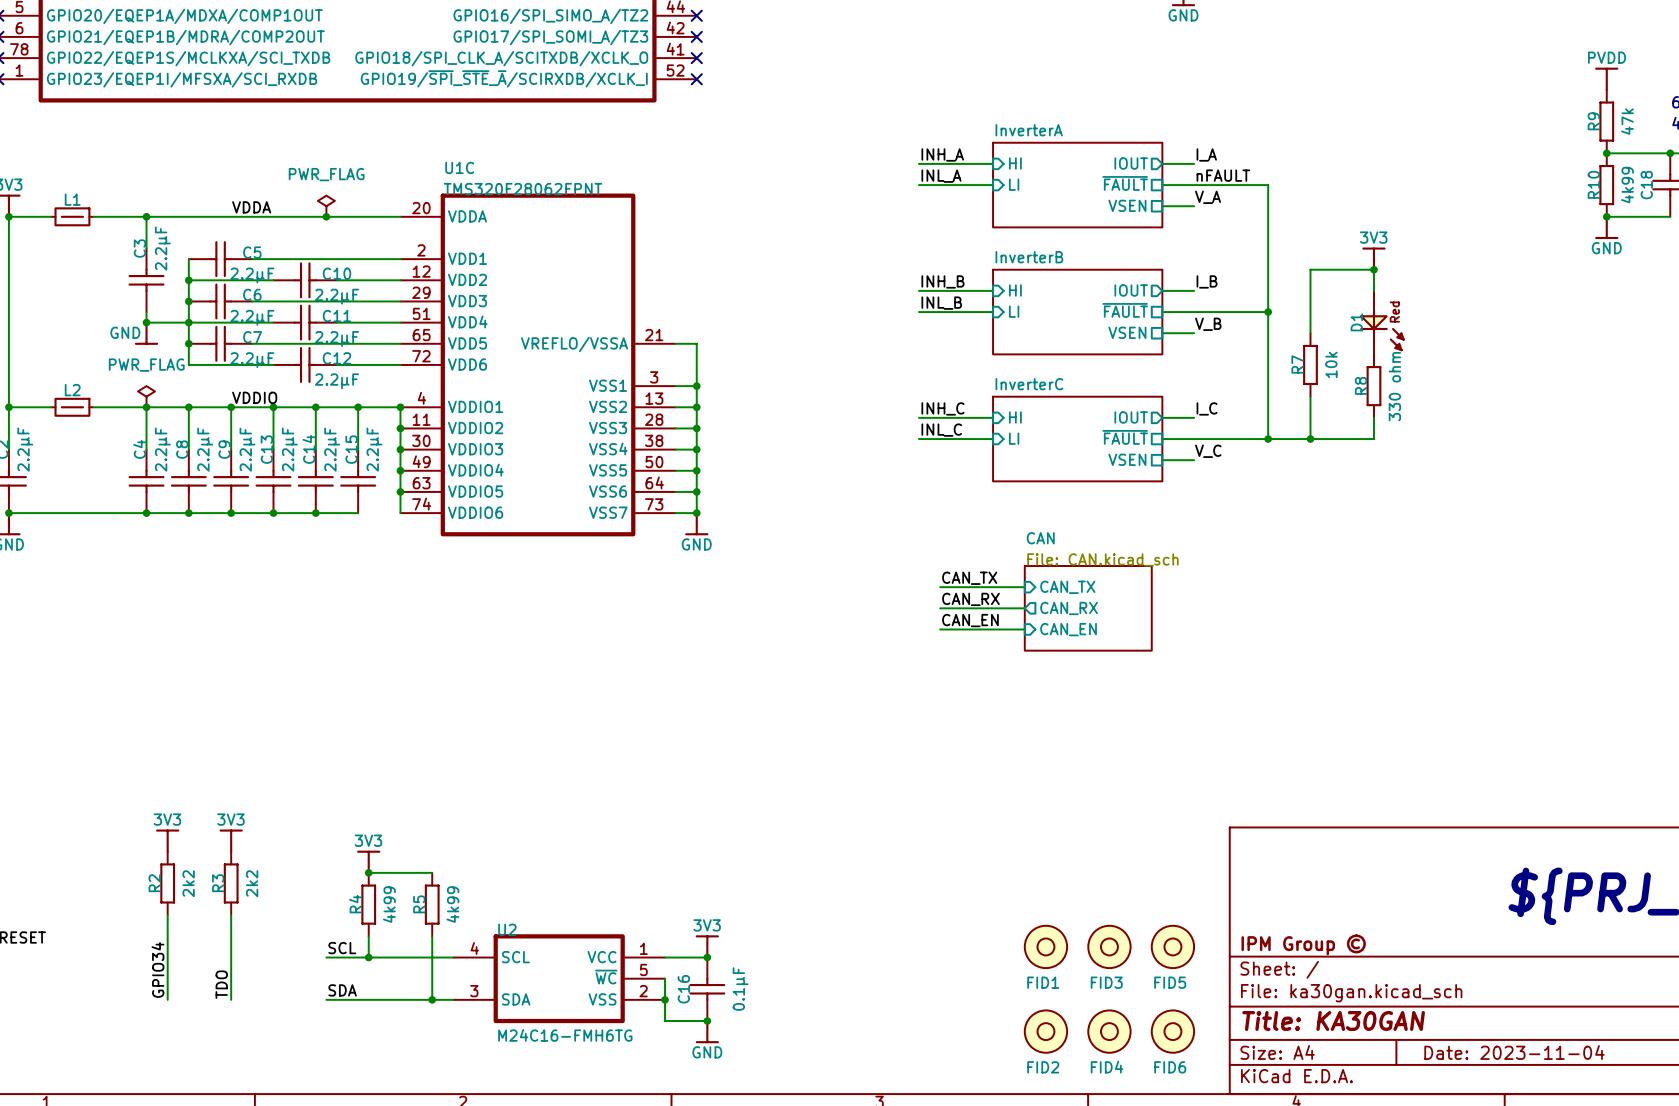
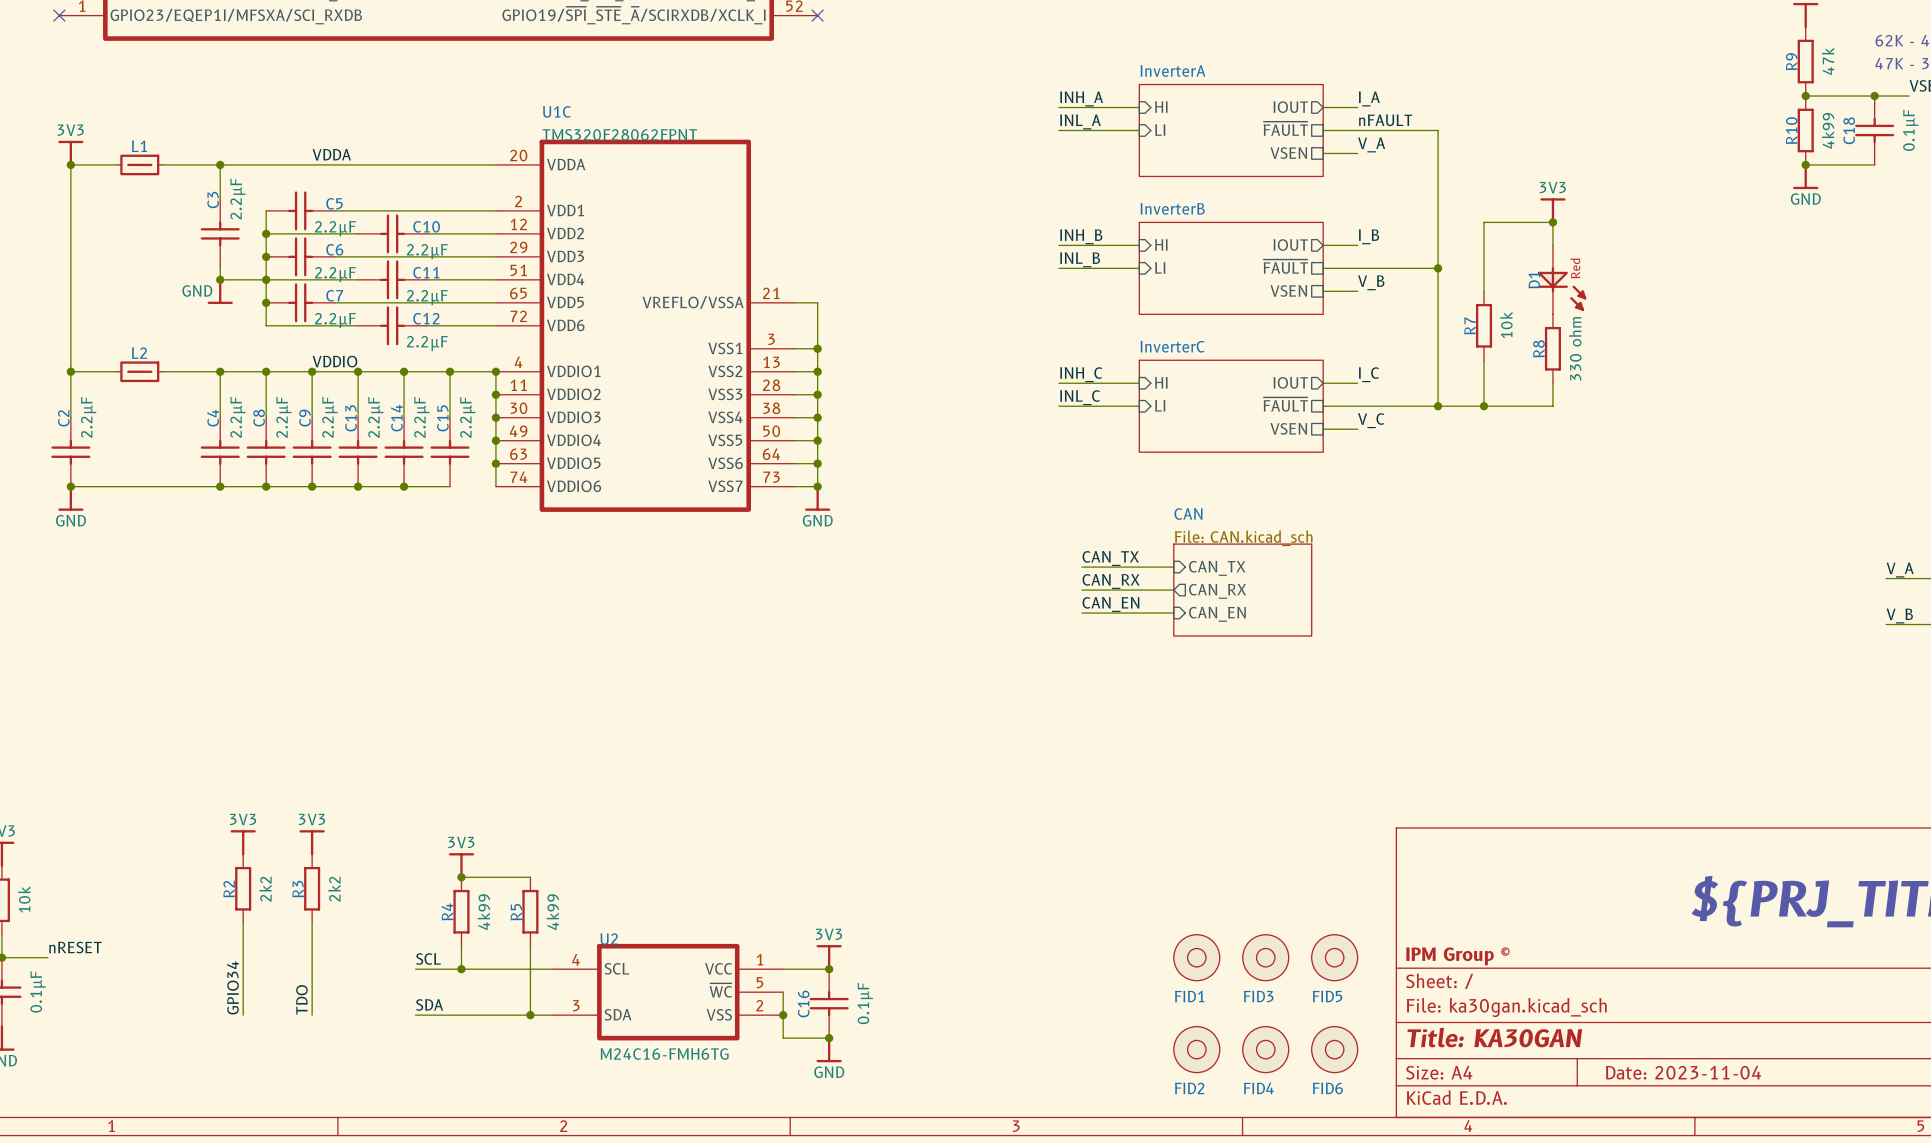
power symbol: PWR_FLAG (326, 206) -> none
junction: (326, 216) -> none
power symbol: PWR_FLAG (146, 396) -> none

